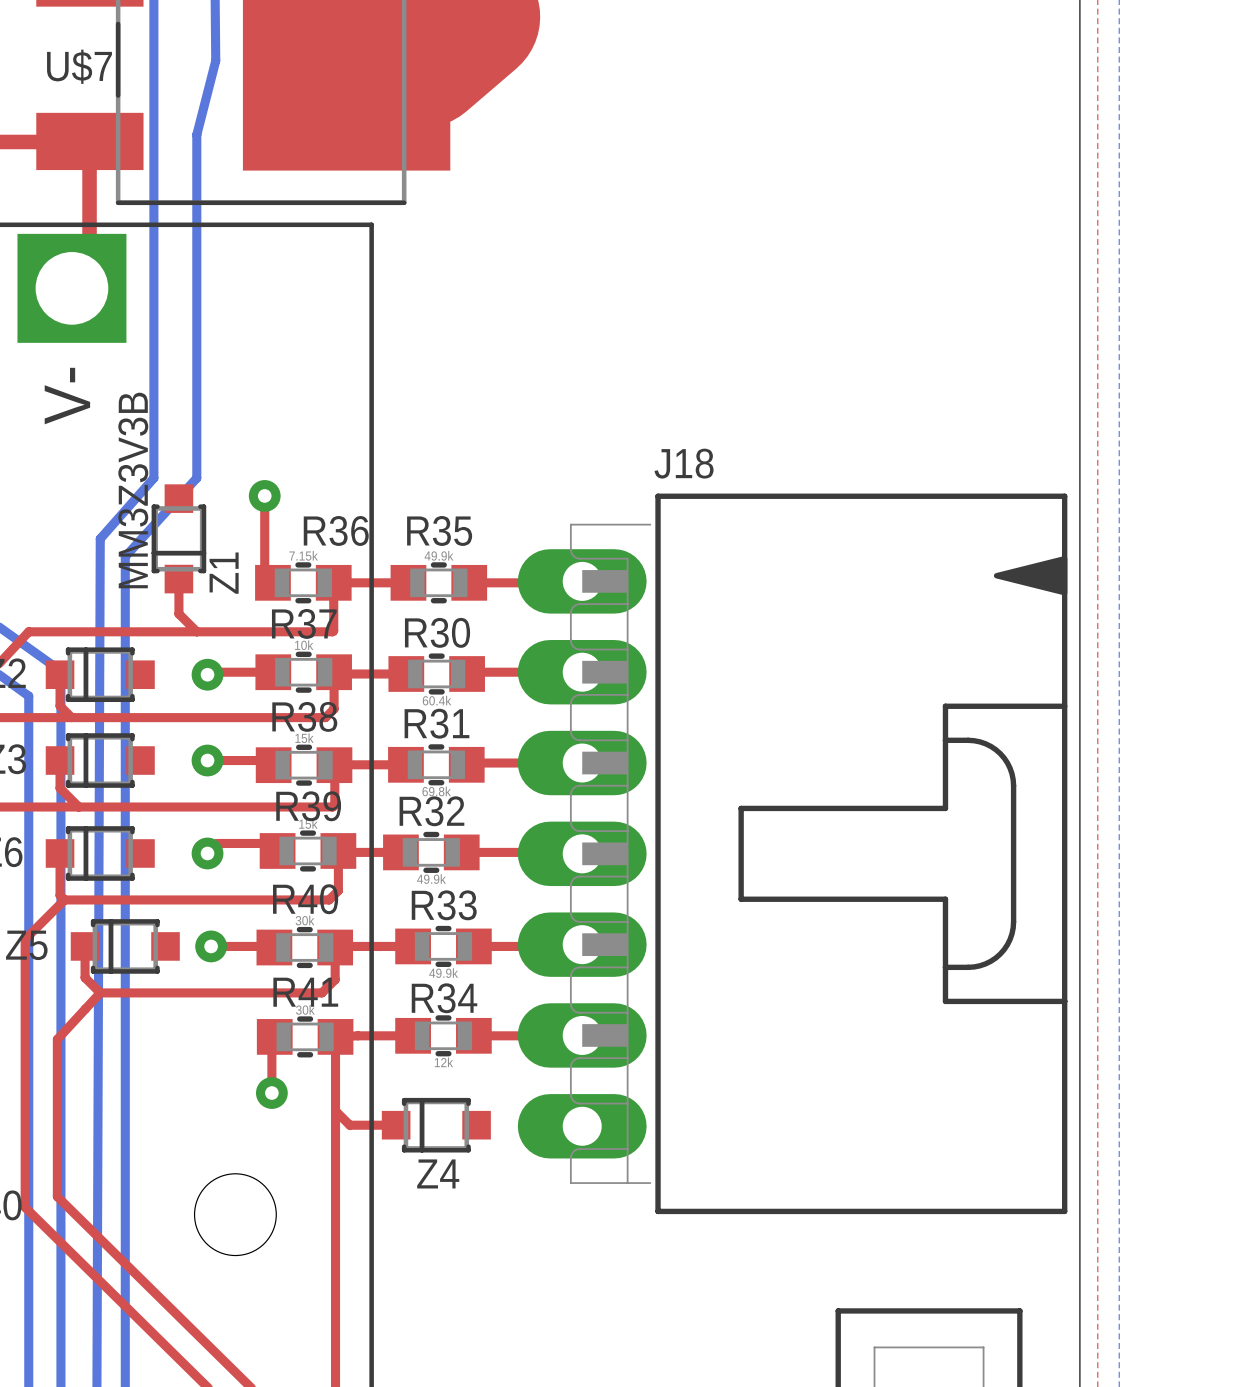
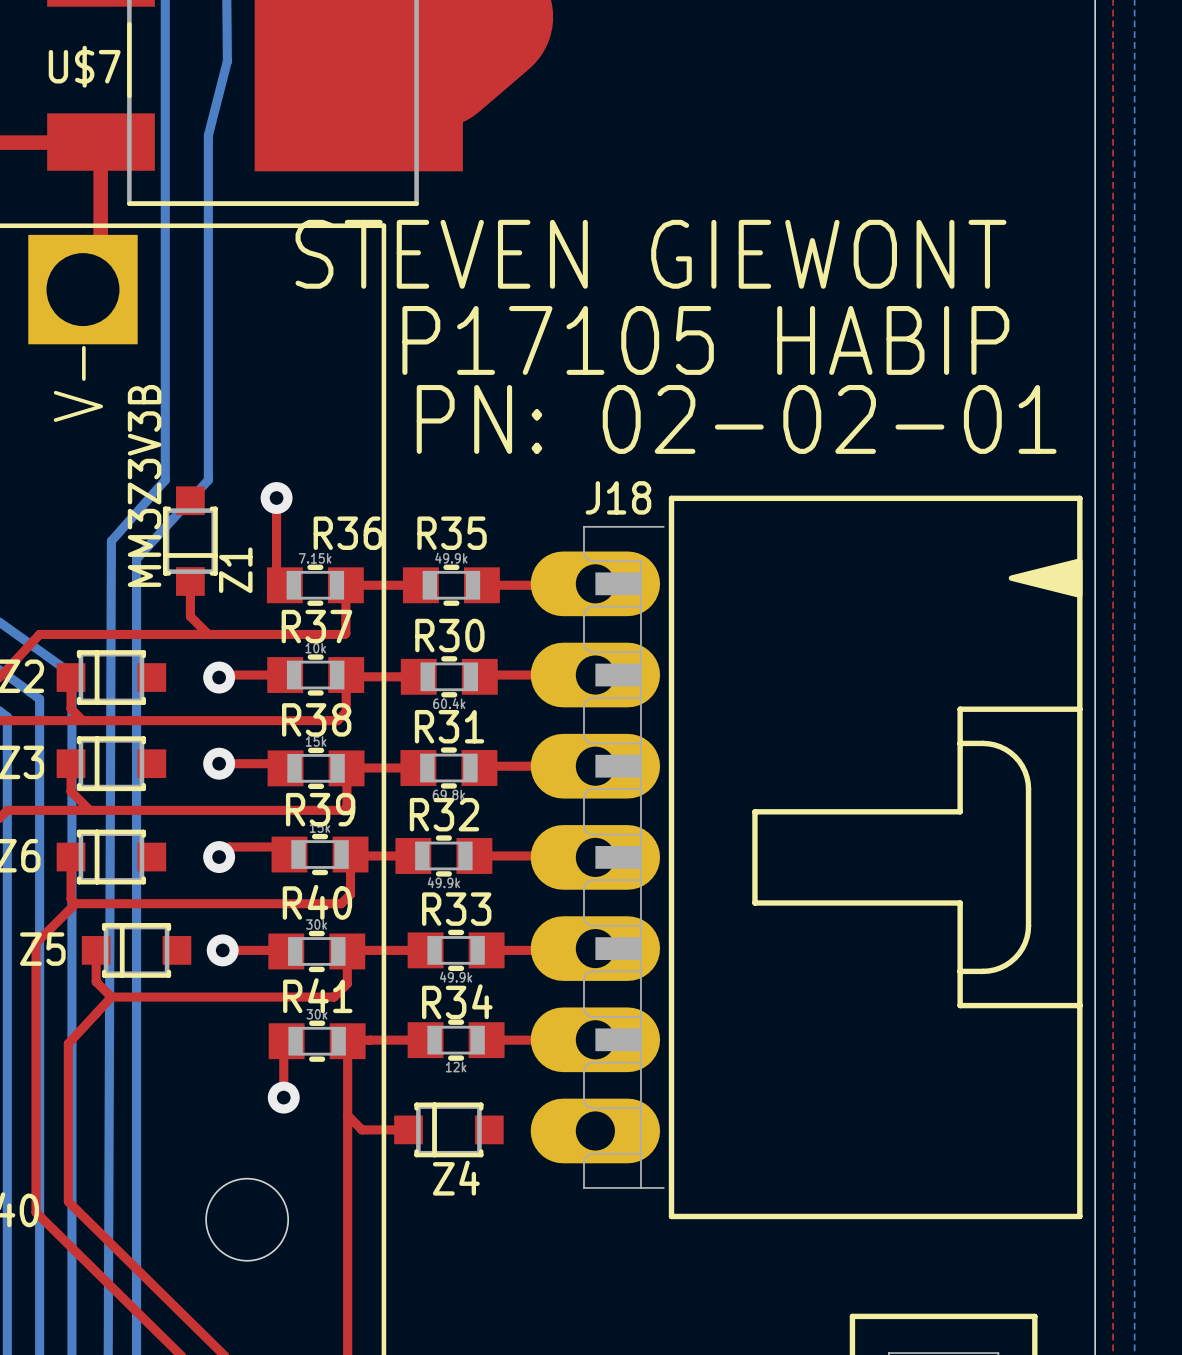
text: none -> STEVEN GIEWONT (650, 254)
text: none -> P17105 HABIP (705, 340)
text: none -> PN: 02-02-01 (736, 419)
J18 name position: J18 (684, 463) -> J18 (618, 497)

